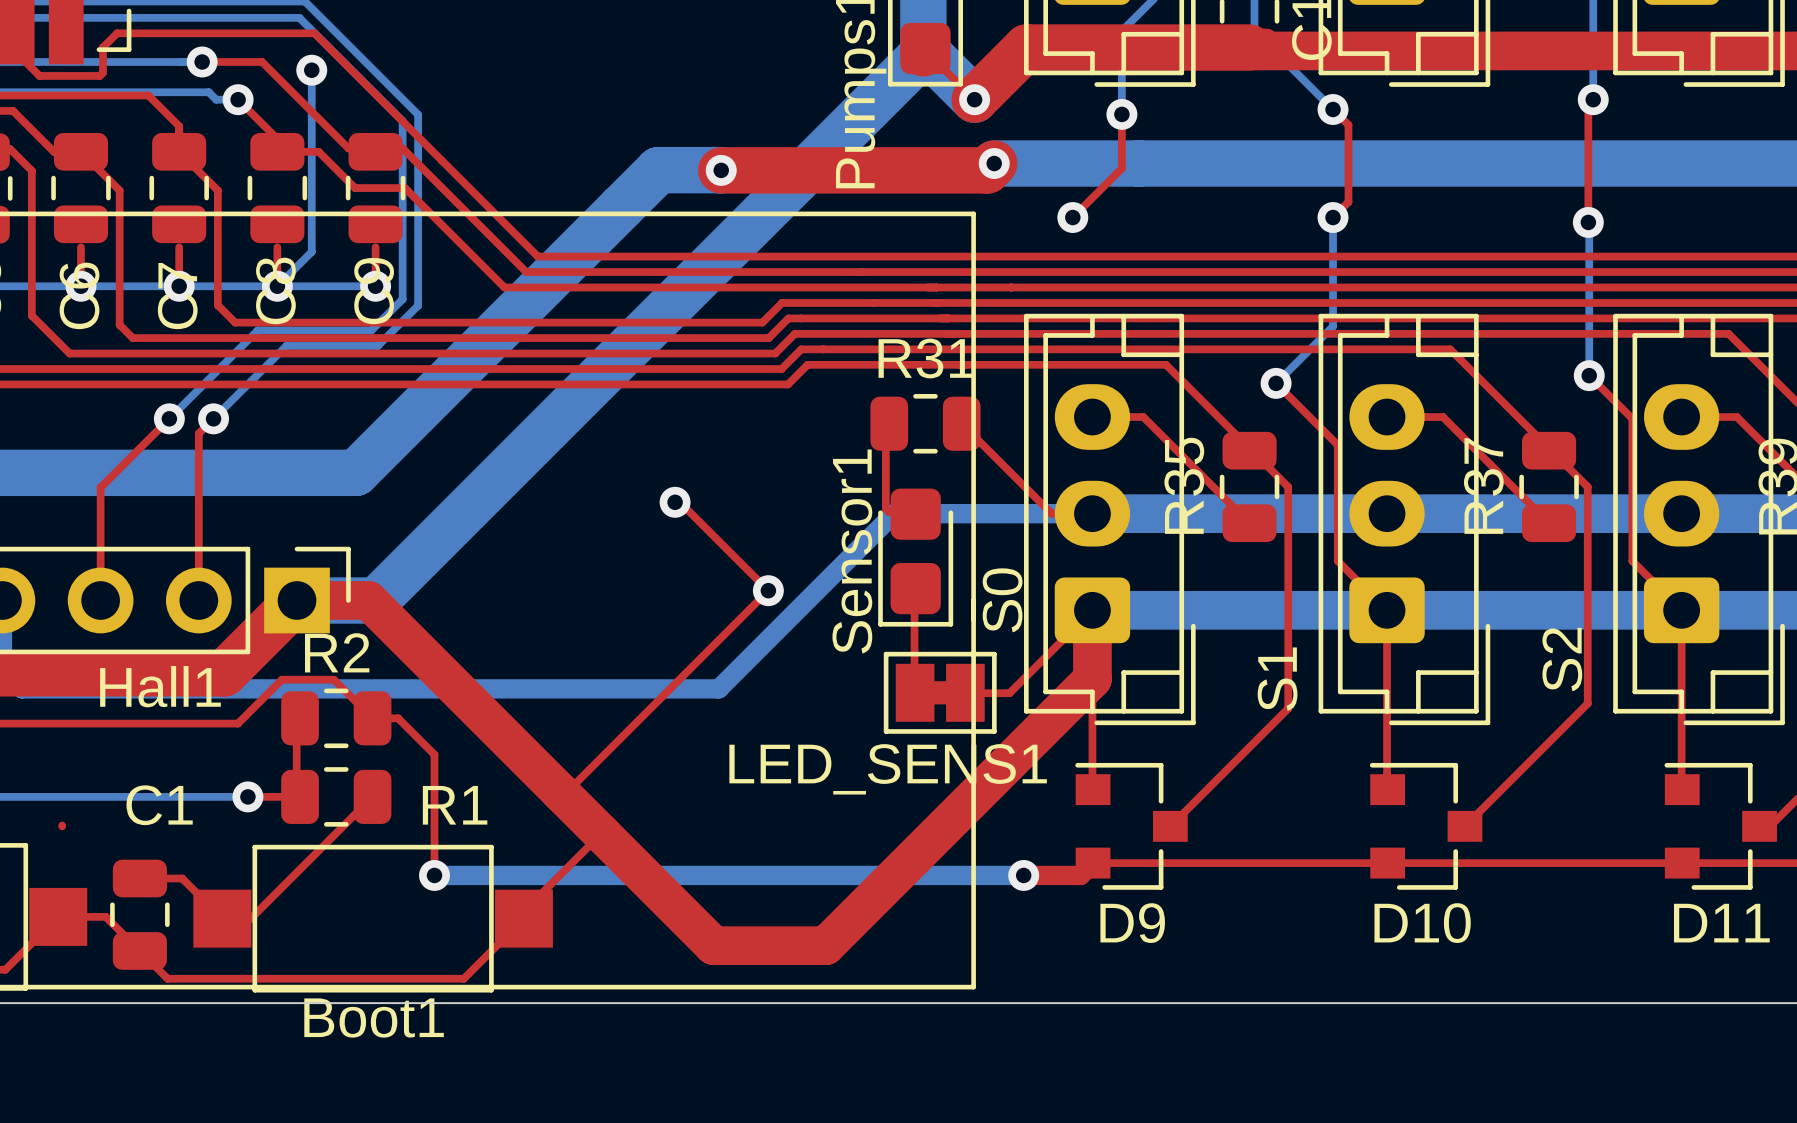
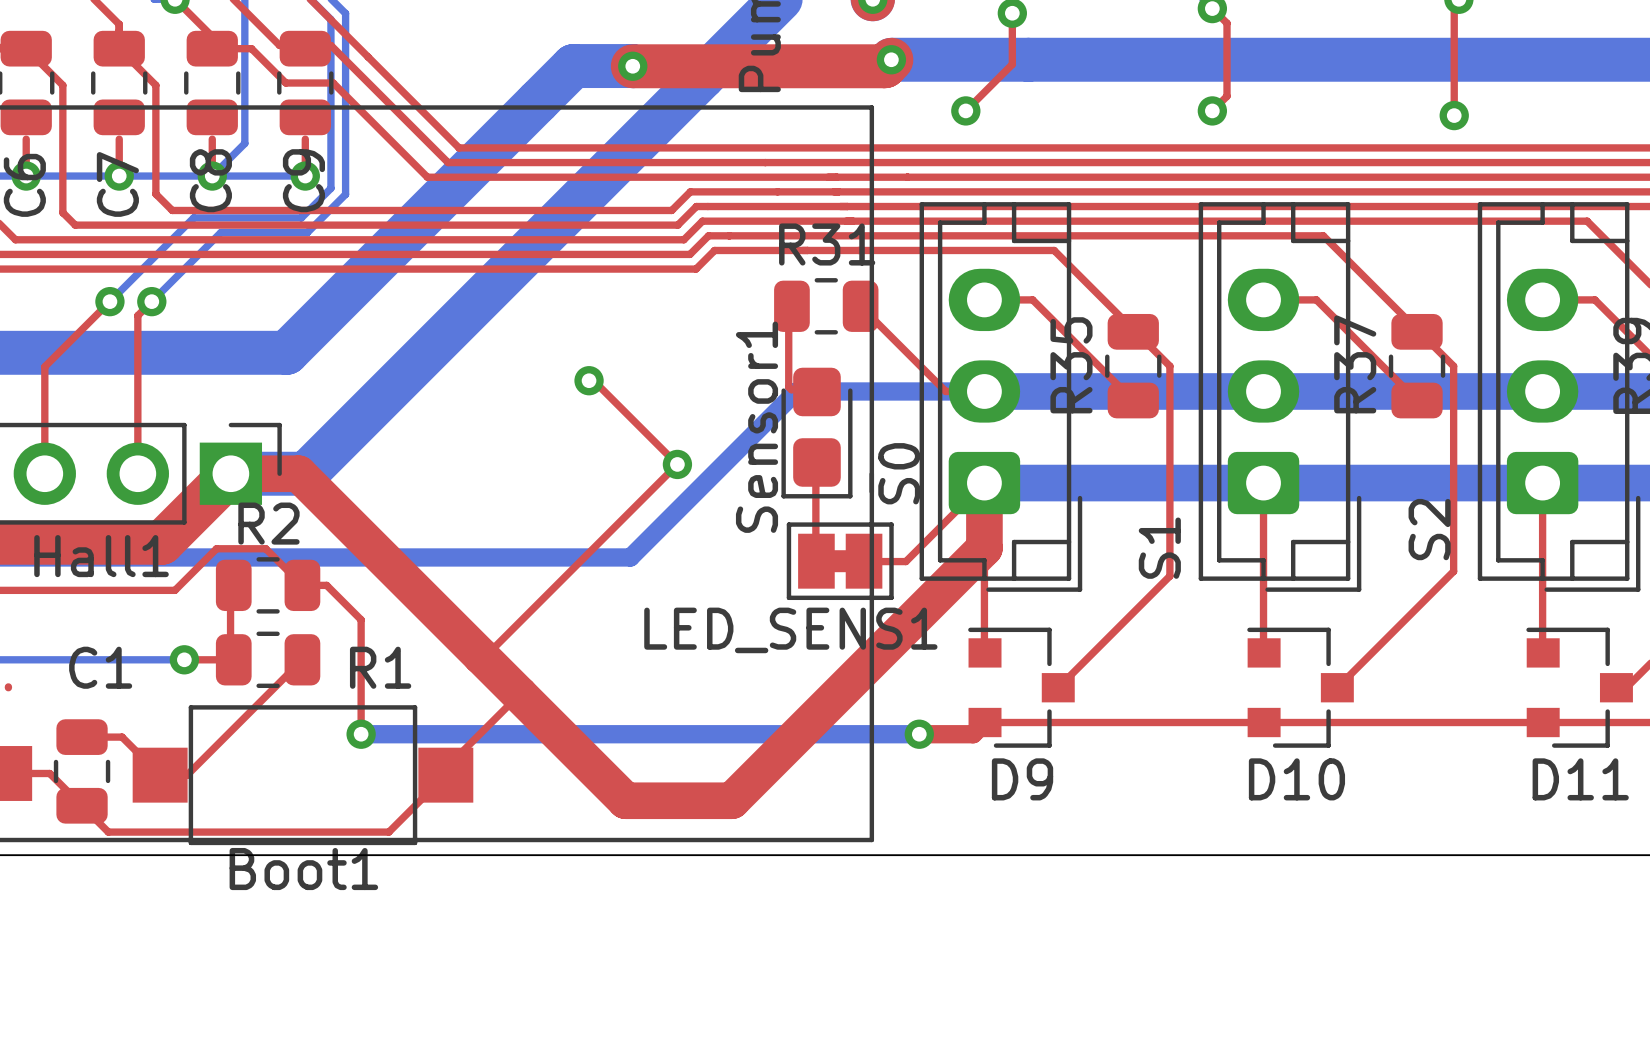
bottom track: (1333, 217) (1333, 326) (1276, 383) -> none
bottom track: (1588, 222) (1589, 375) -> none
top track: (1589, 375) (1632, 418) (1632, 561) (1681, 610) -> none
via: (1589, 375) -> none
top track: (1276, 383) (1337, 445) (1337, 561) (1387, 610) -> none
via: (1276, 383) -> none

